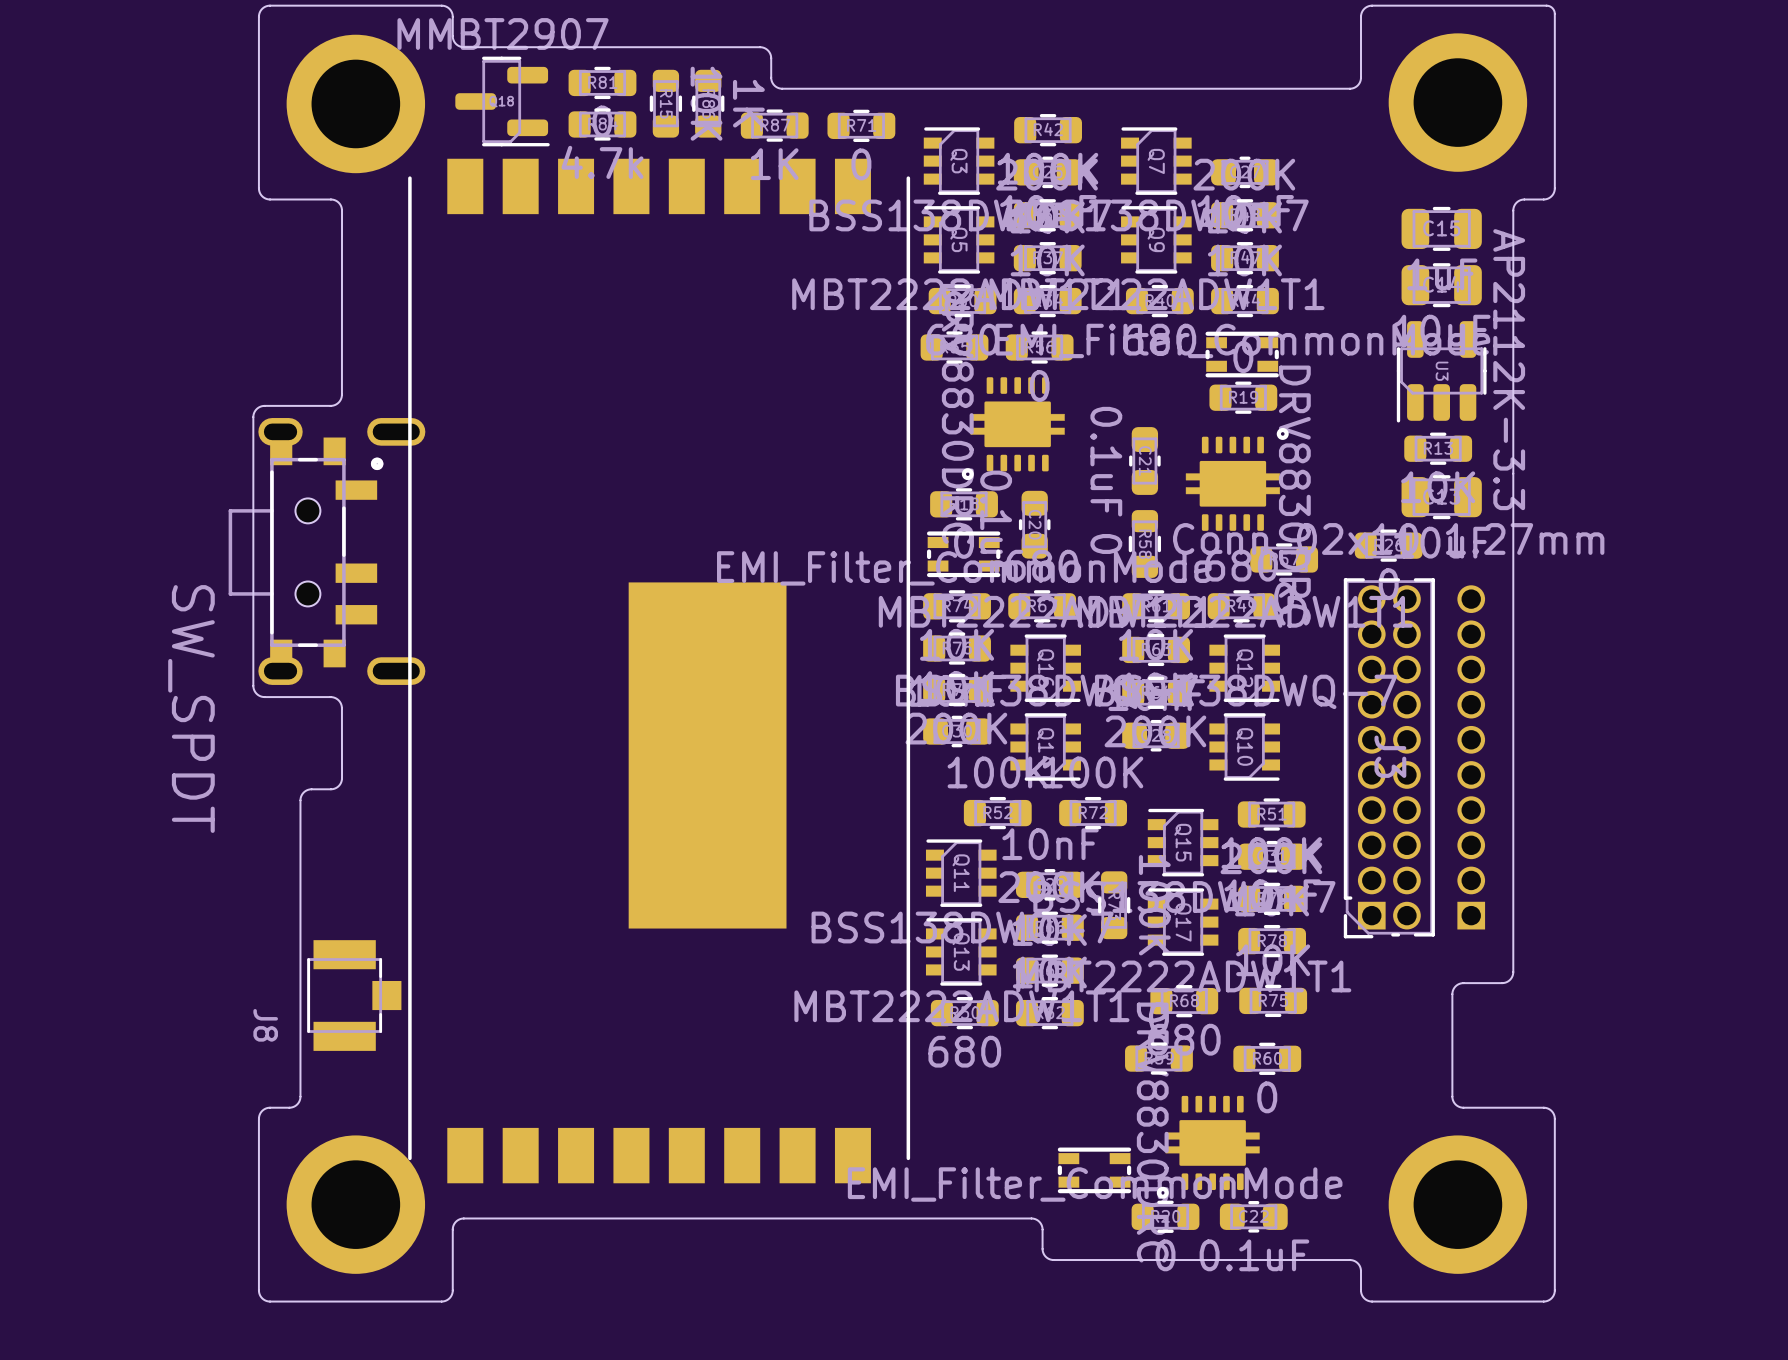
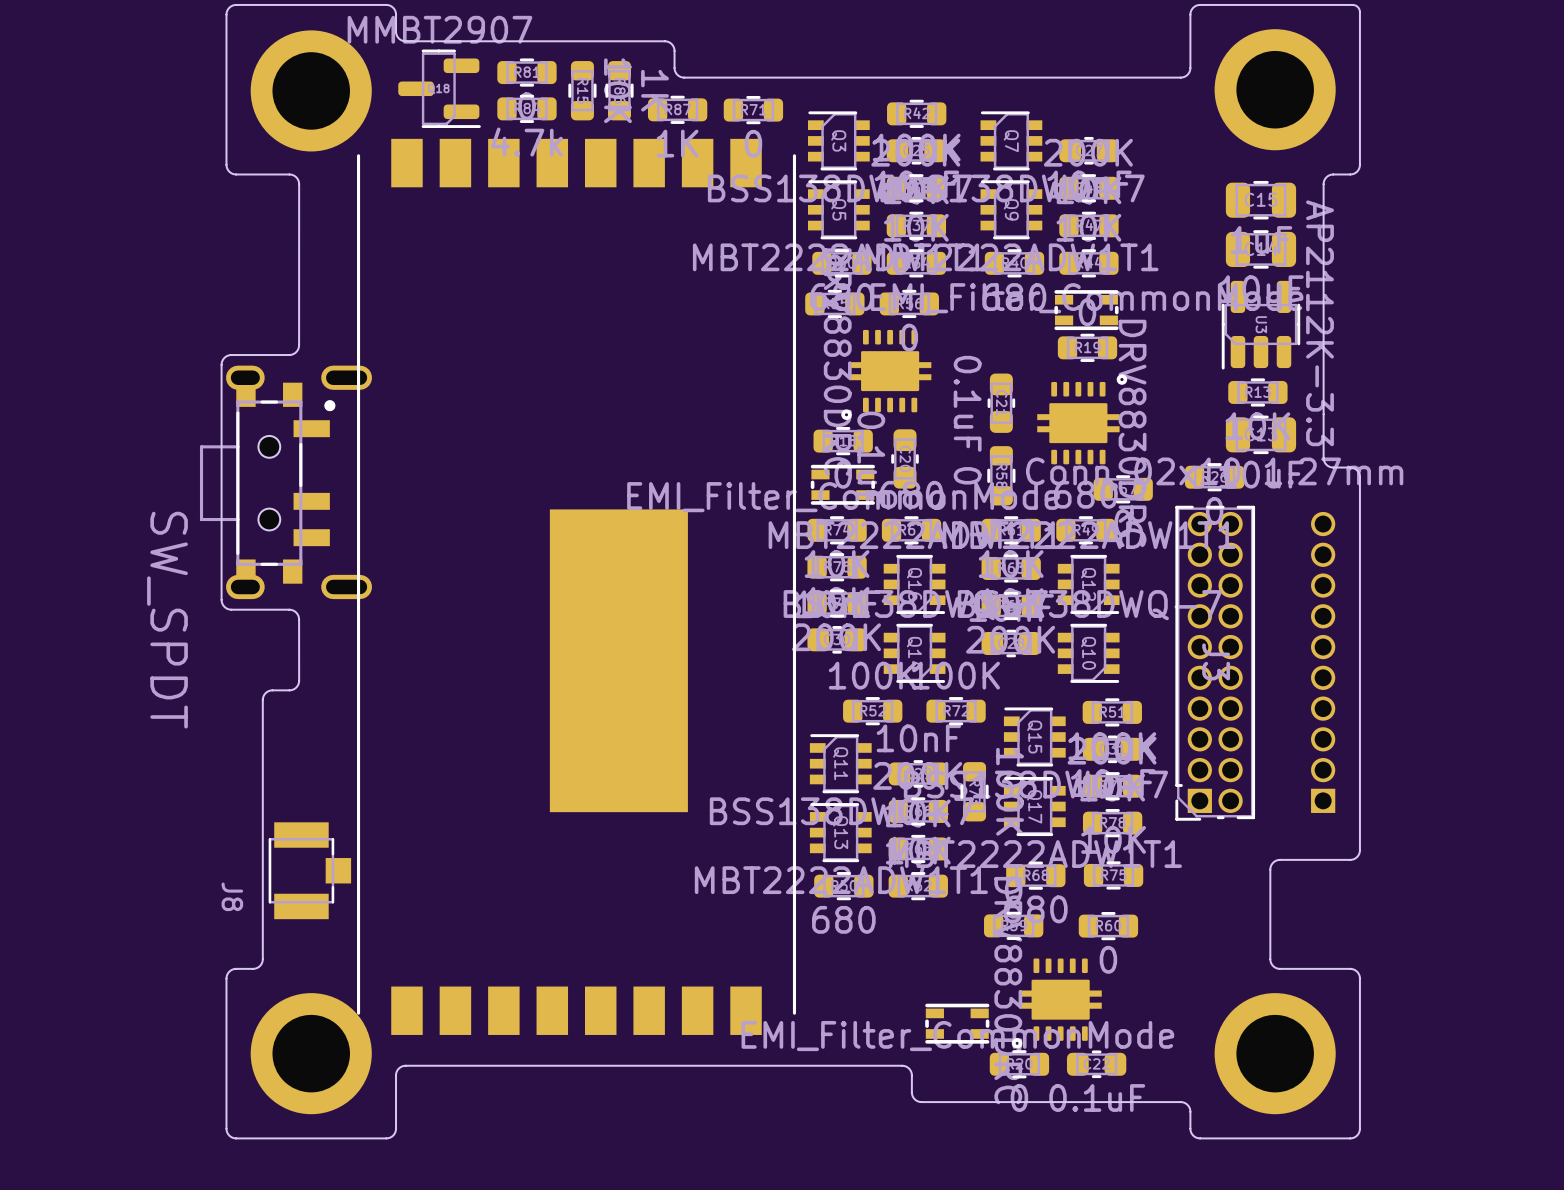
board edge: (1513, 523) (1513, 972) (1510, 979) (1502, 983) -> (1323, 457) (1329, 466) (1353, 468) (1359, 476) (1359, 850) (1357, 856) (1352, 859) (1313, 859)
part position: (1471, 757) -> (1323, 662)

